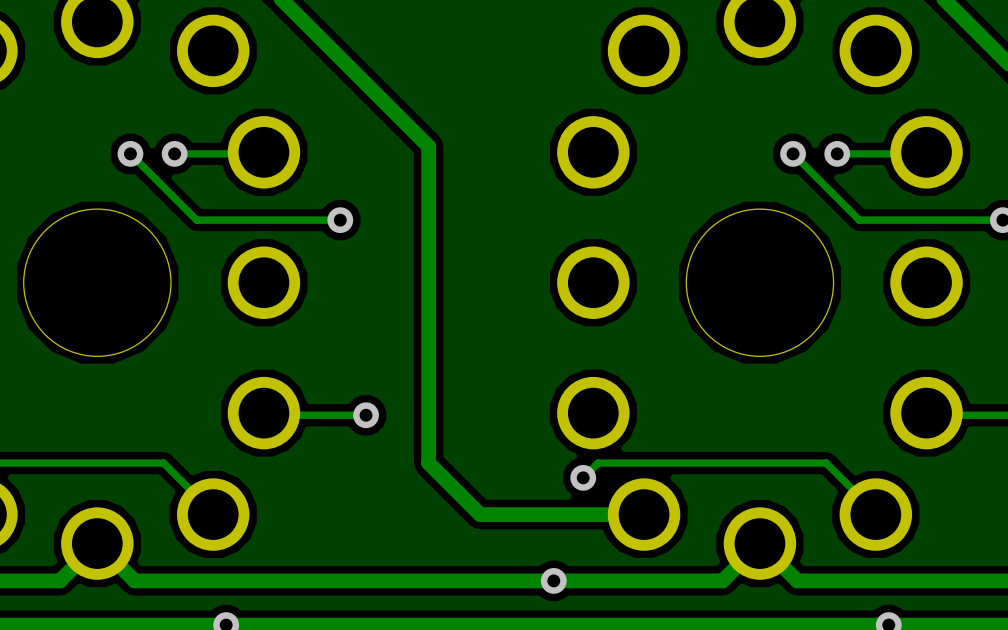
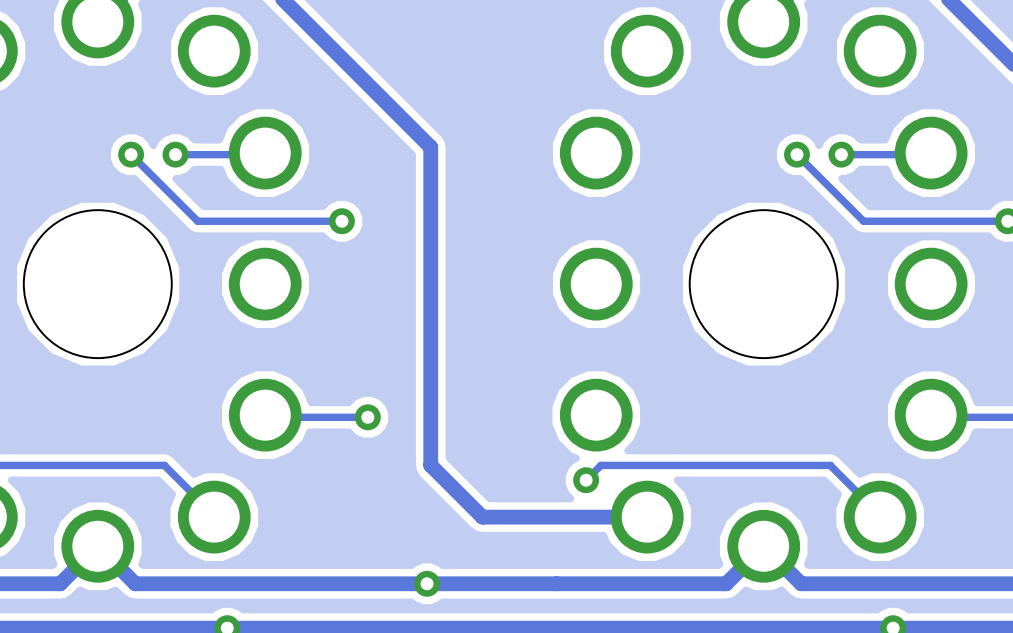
via: none -> (427, 583)
via: (553, 580) -> none

